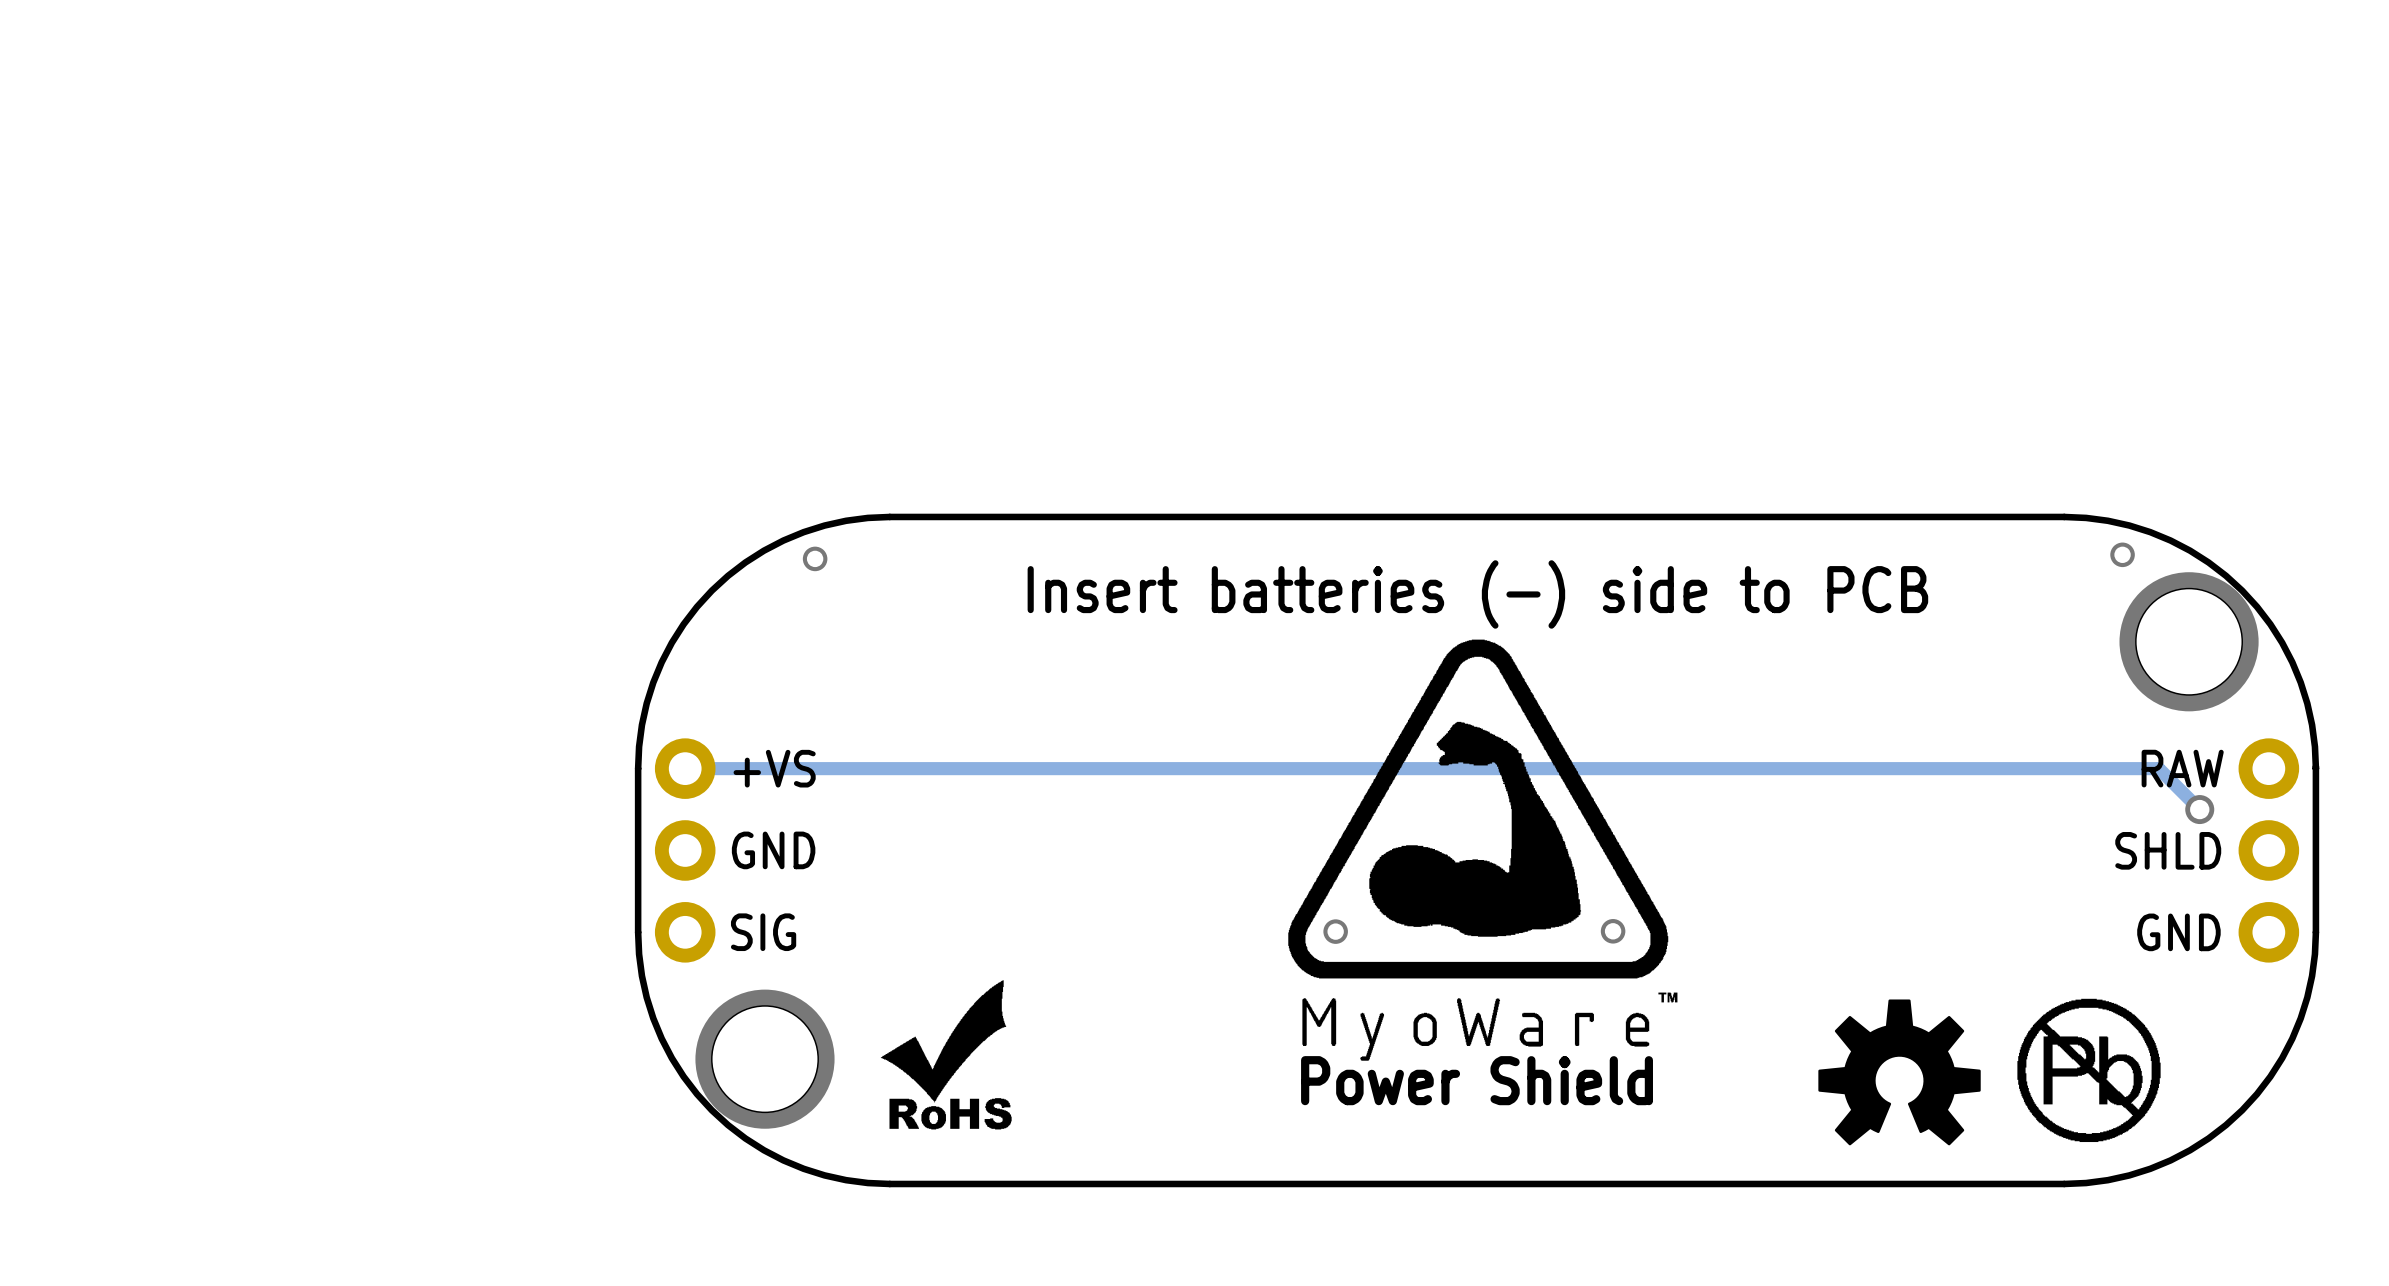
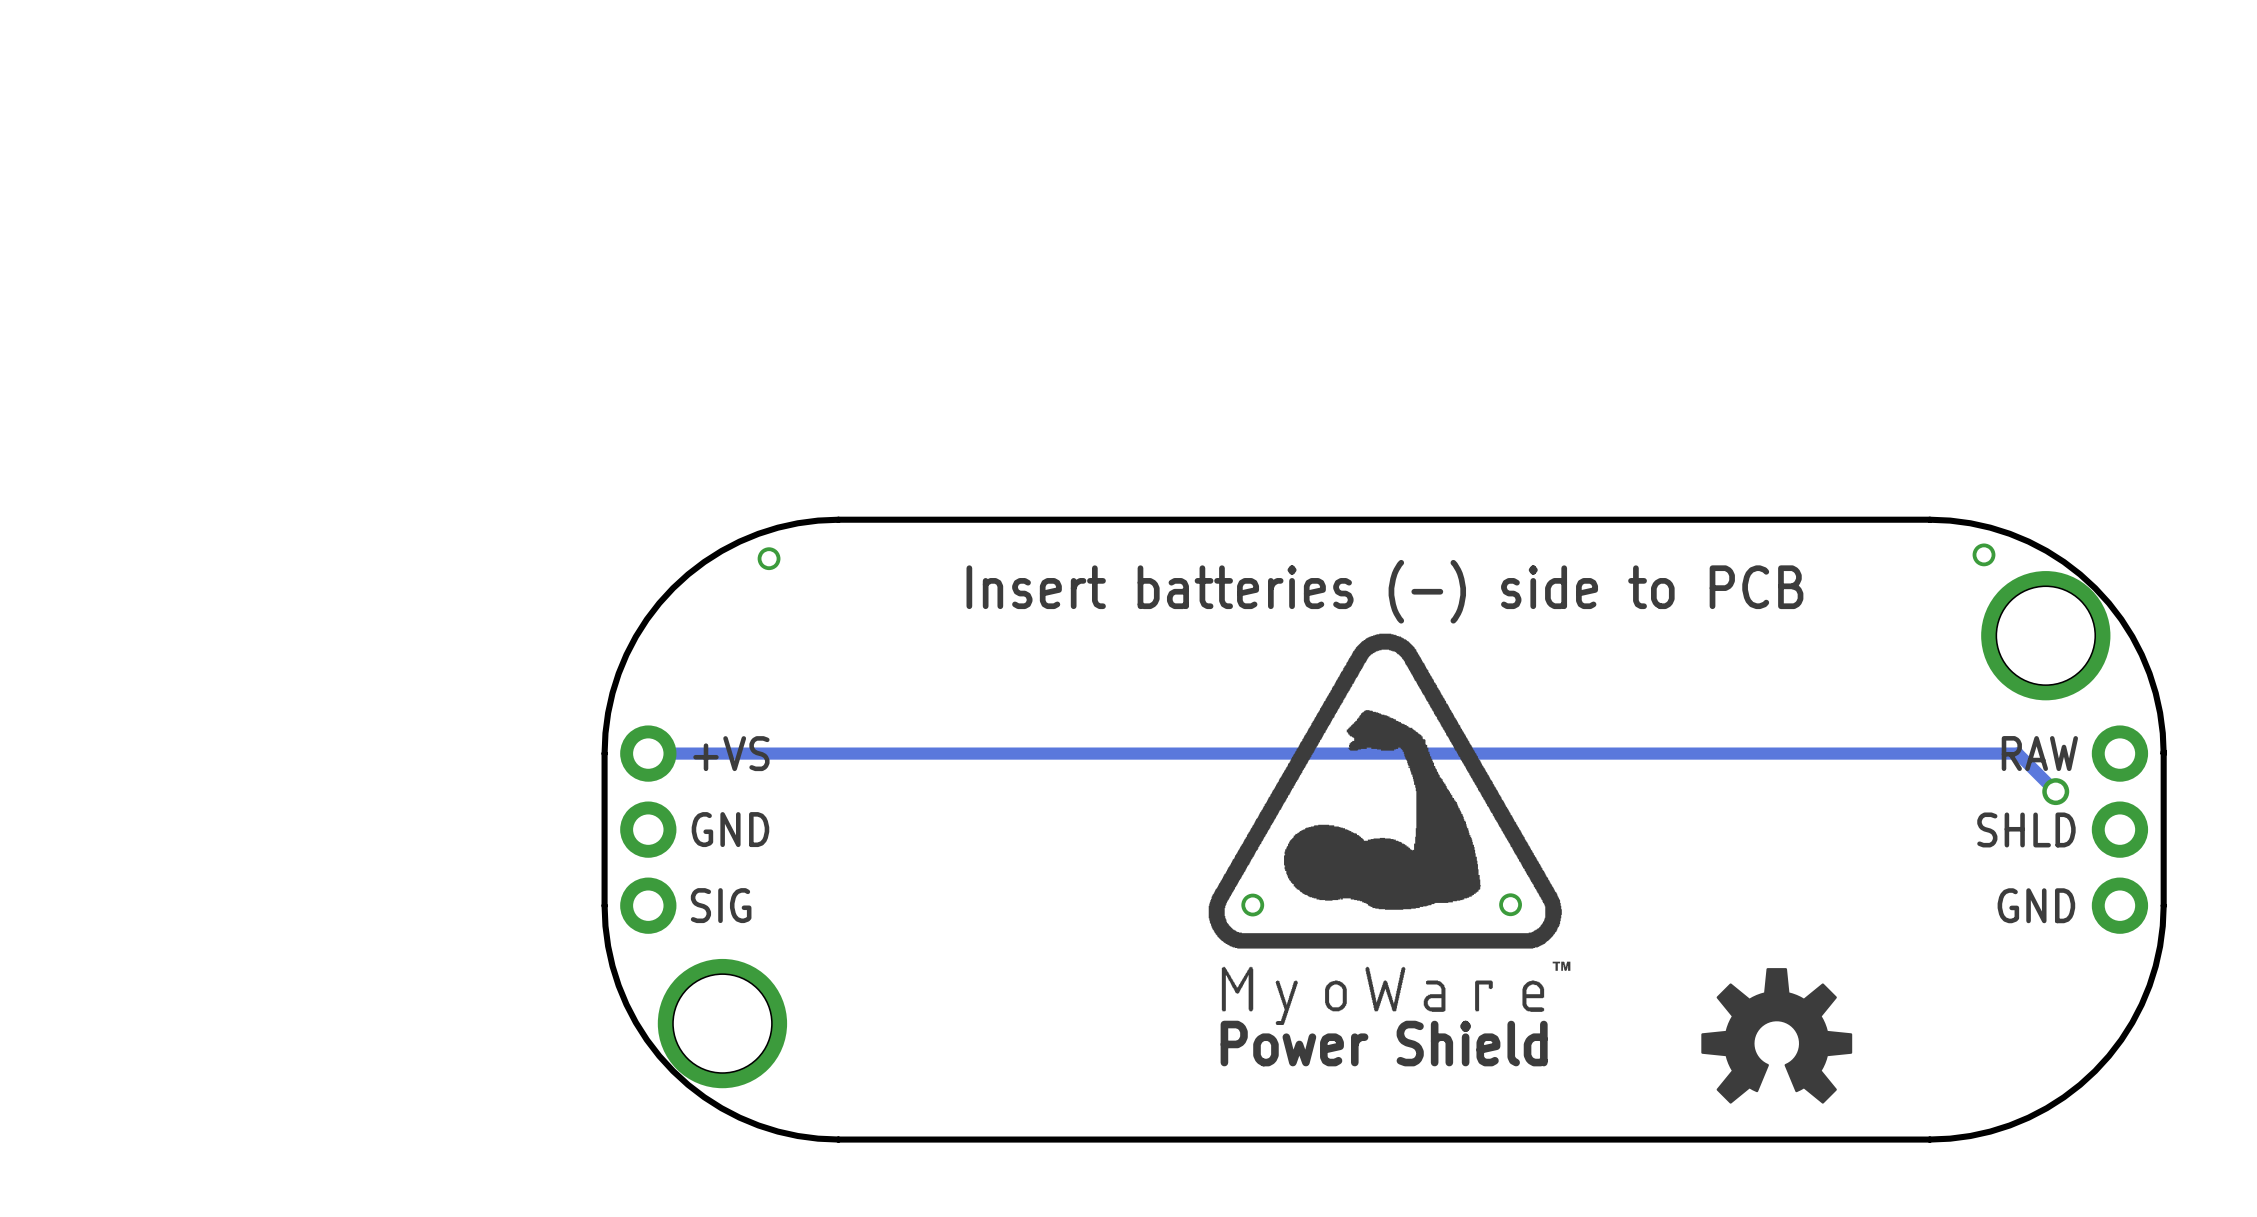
drawing: [880, 980, 1012, 1130] -> none
drawing: [2017, 998, 2161, 1143] -> none

